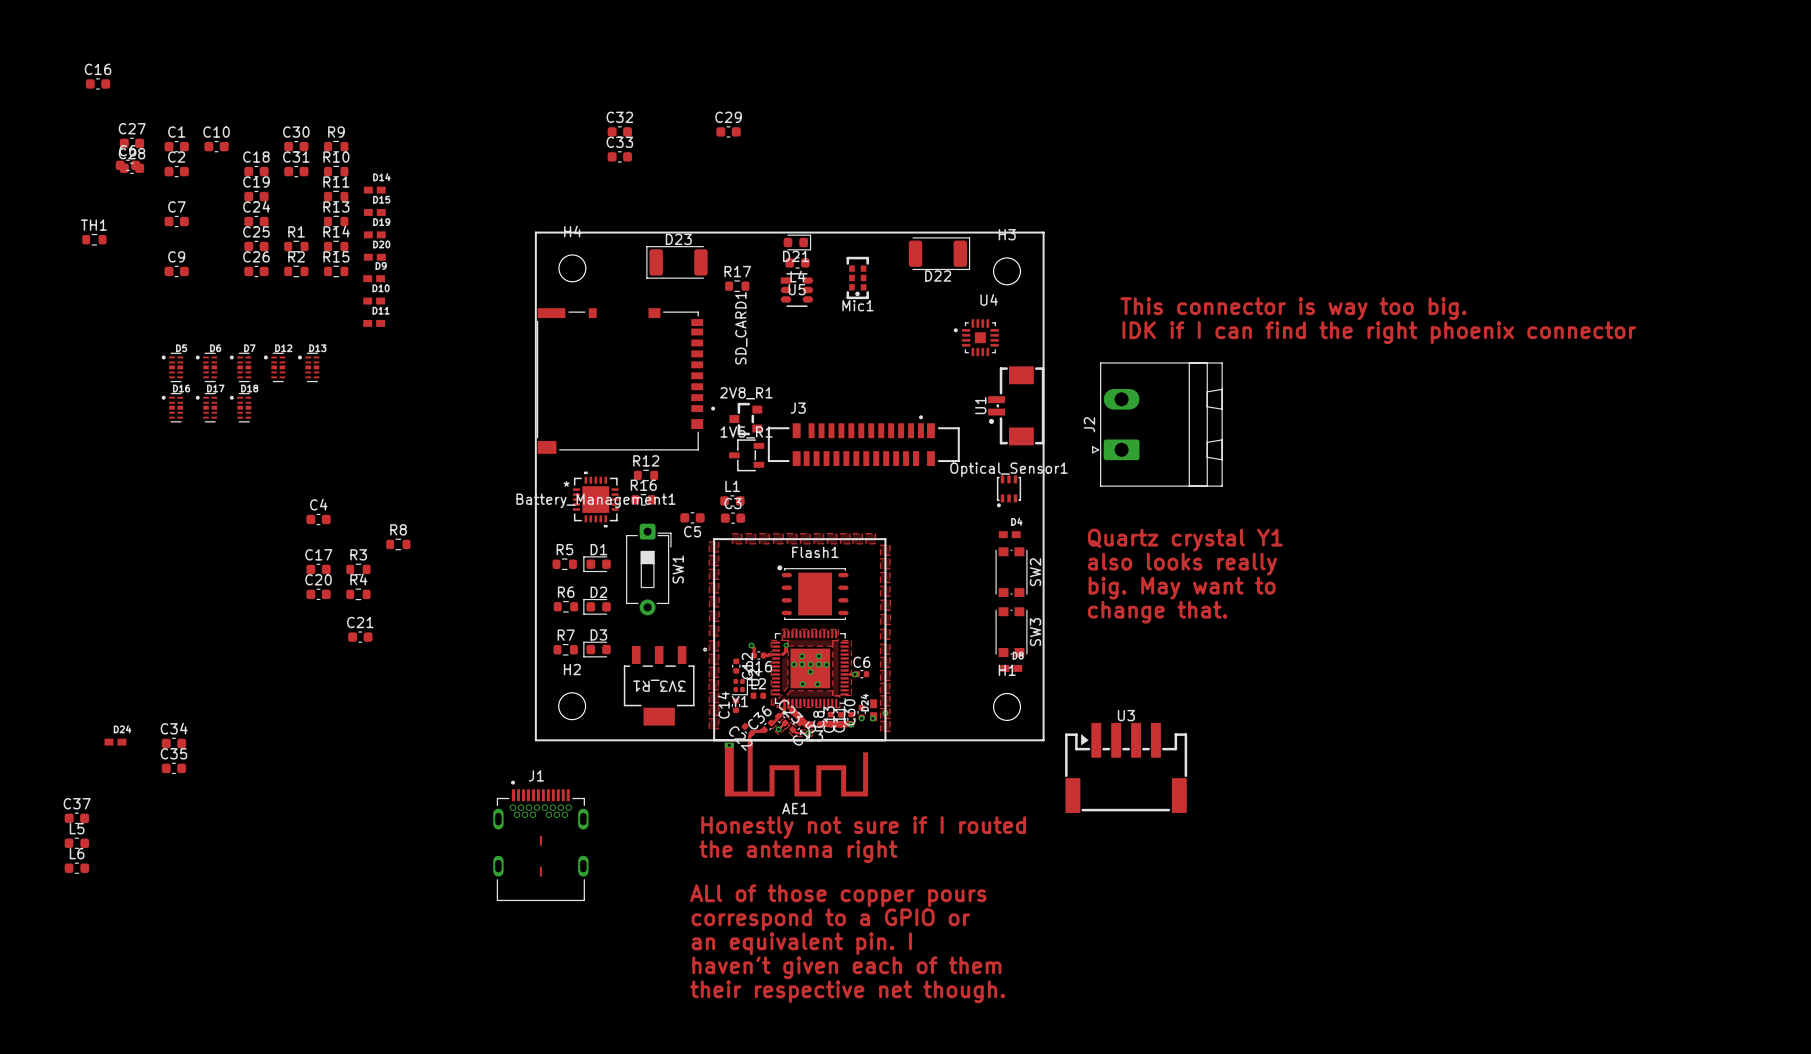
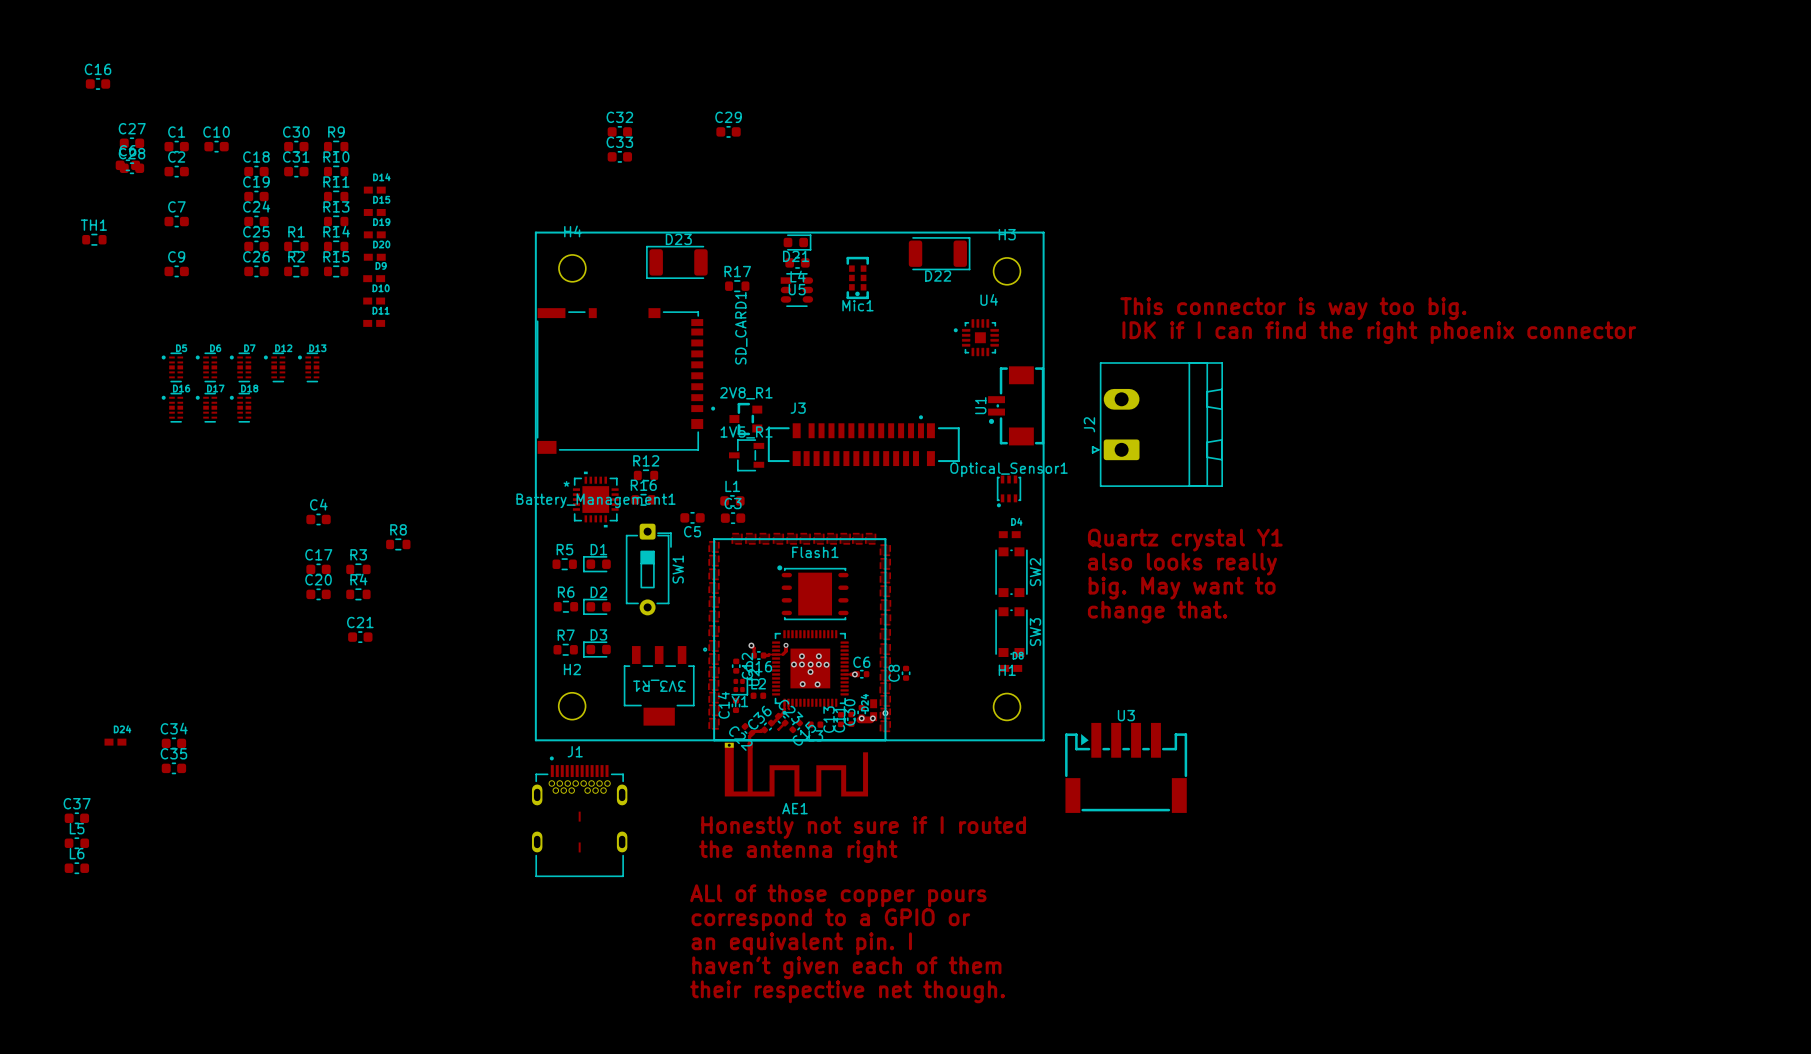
top zone outline: (771, 640) (771, 705) (773, 705) (787, 686) (788, 640) (771, 640) -> none
top zone outline: (838, 640) (838, 629) (782, 629) (782, 640) (788, 640) (788, 646) (832, 646) -> none
top zone outline: (832, 690) (790, 690) (776, 707) (839, 707) (839, 695) (832, 695) -> none
top zone outline: (832, 695) (832, 640) (851, 640) (851, 695) (832, 695) -> none
top track: (792, 710) (806, 724) (810, 724) -> none
top zone outline: (786, 715) (772, 729) (779, 734) (792, 721) (786, 715) -> none
C8 position: (830, 719) -> (906, 673)
top track: none -> (859, 719) (871, 719)
top zone outline: (792, 722) (785, 729) (792, 736) (812, 736) (812, 729) (799, 729) (792, 722) -> none
top track: (851, 724) (820, 724) -> none
via: (851, 724) -> none
via: (778, 729) -> none
top track: (792, 729) (796, 733) (808, 733) -> none
via: (808, 733) -> none
J1 position: (540, 840) -> (579, 816)

